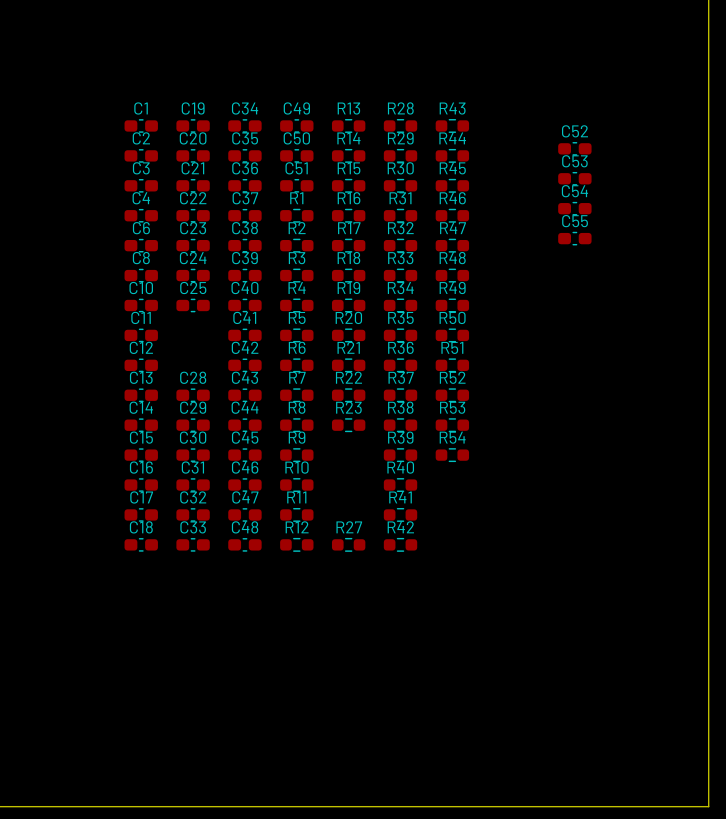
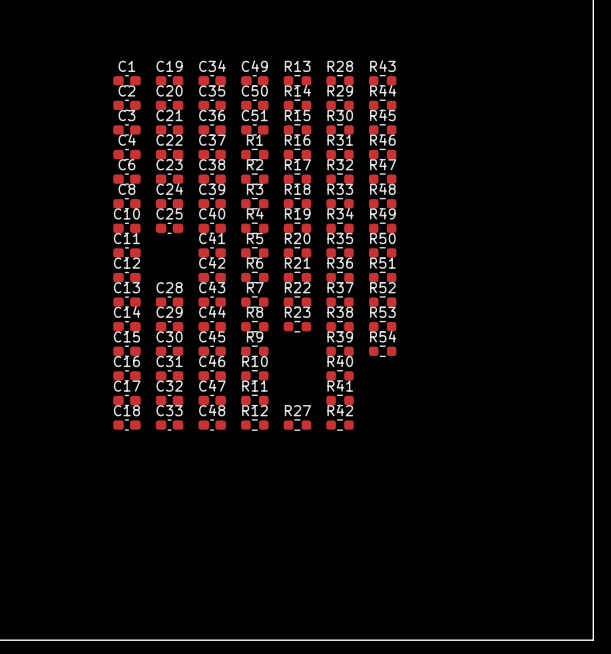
C52: (574, 148) -> none
C53: (574, 178) -> none
C54: (574, 208) -> none
C55: (574, 238) -> none

